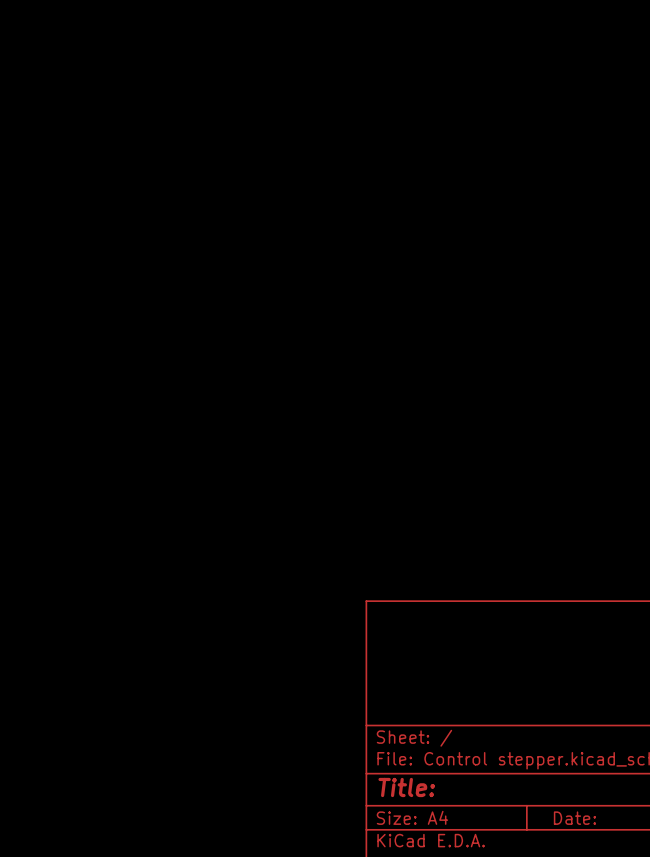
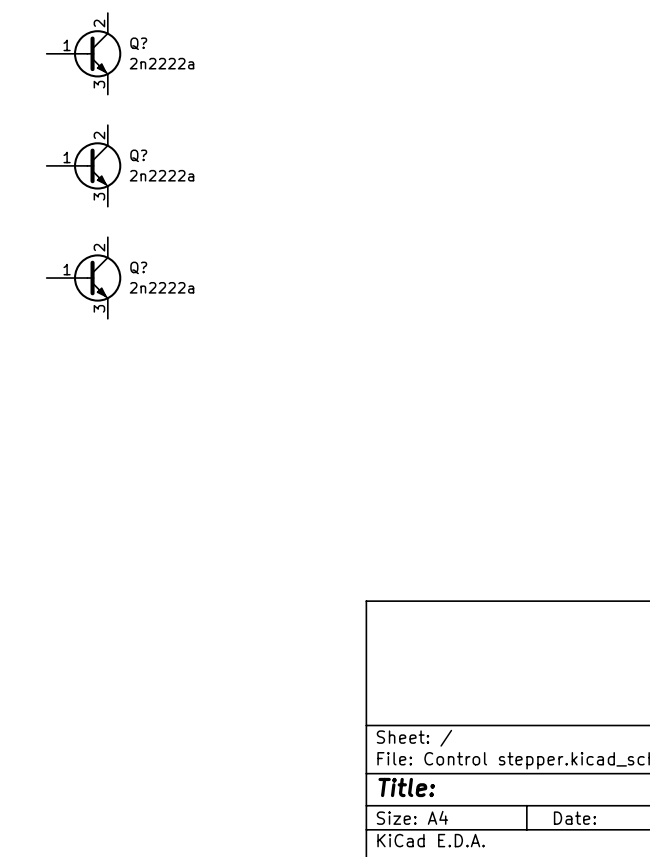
Q?: none -> 2n2222a (83, 53)
Q?: none -> 2n2222a (83, 165)
Q?: none -> 2n2222a (83, 278)

